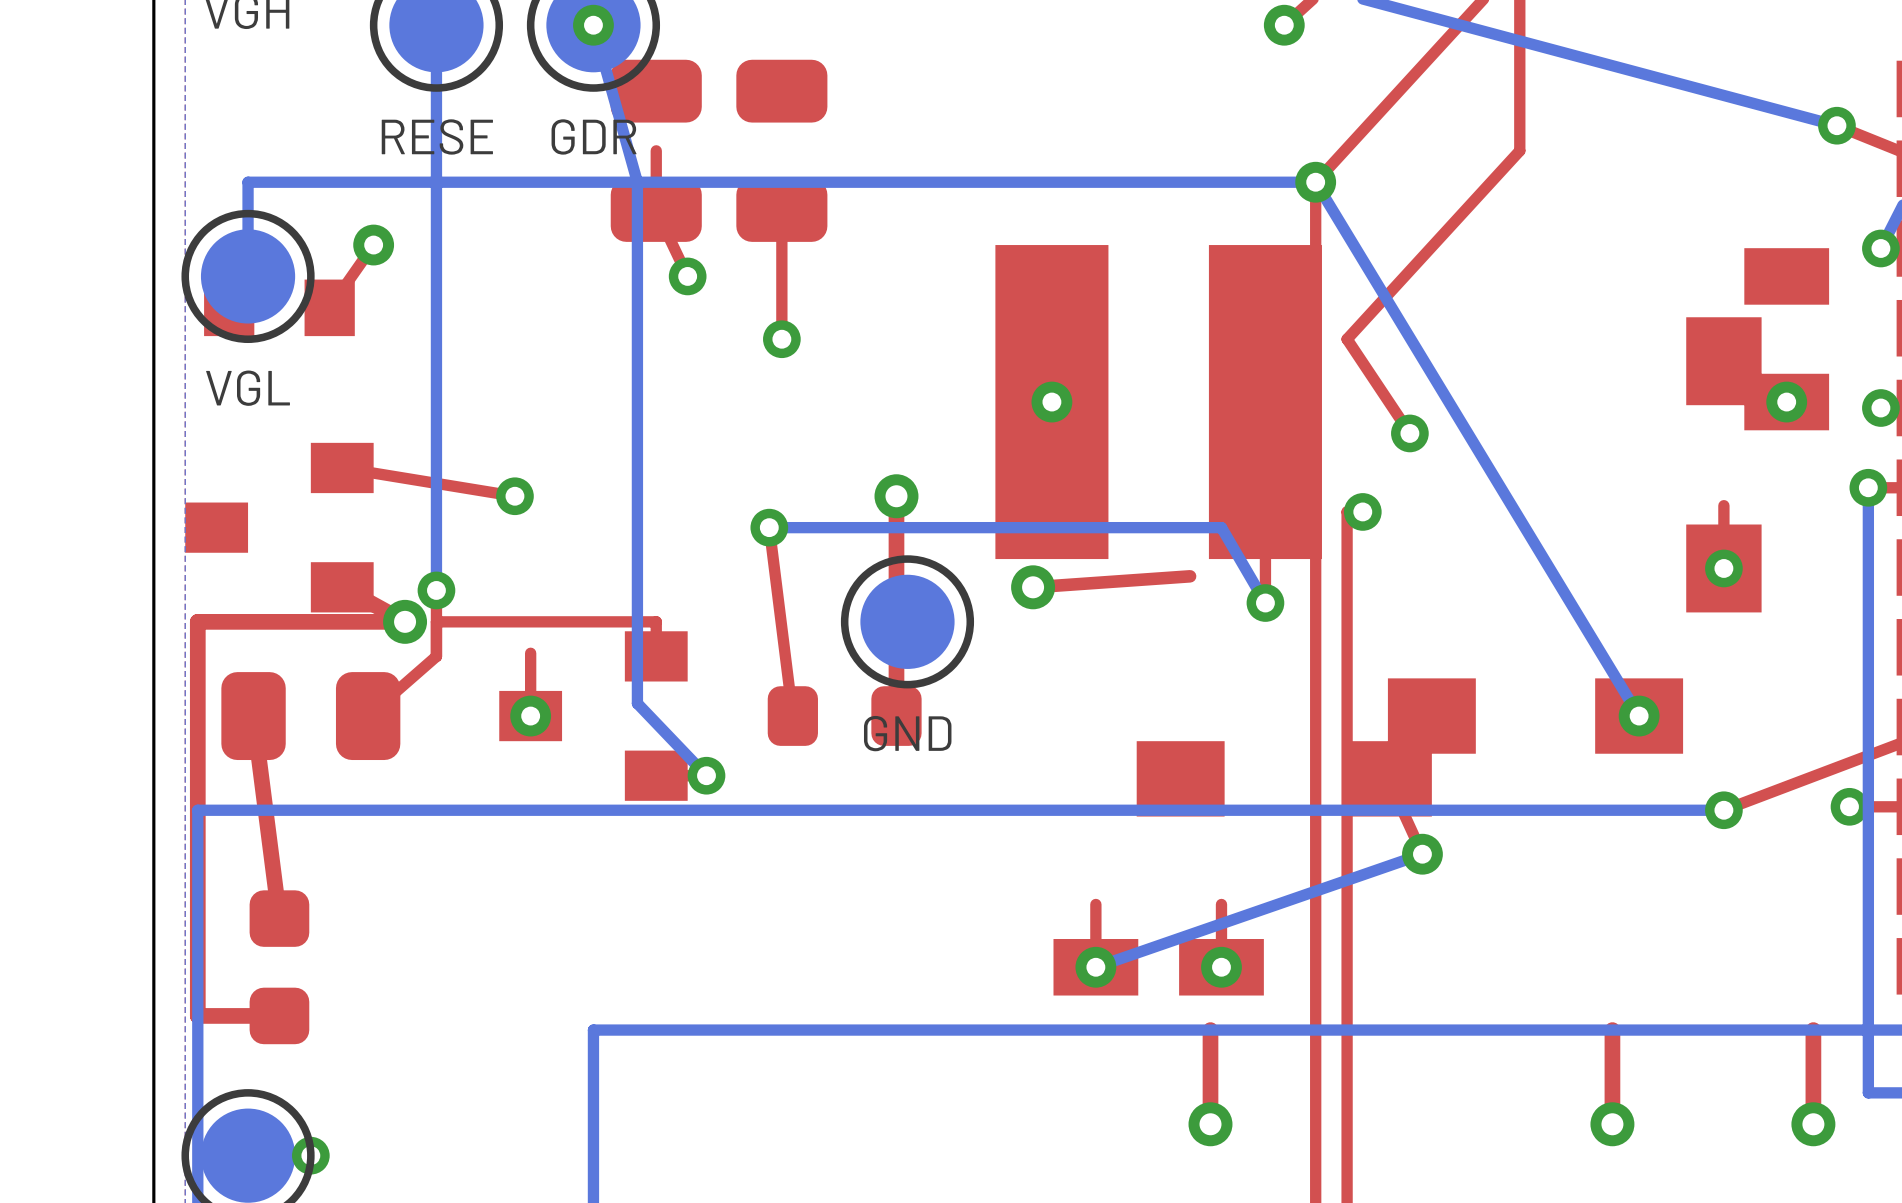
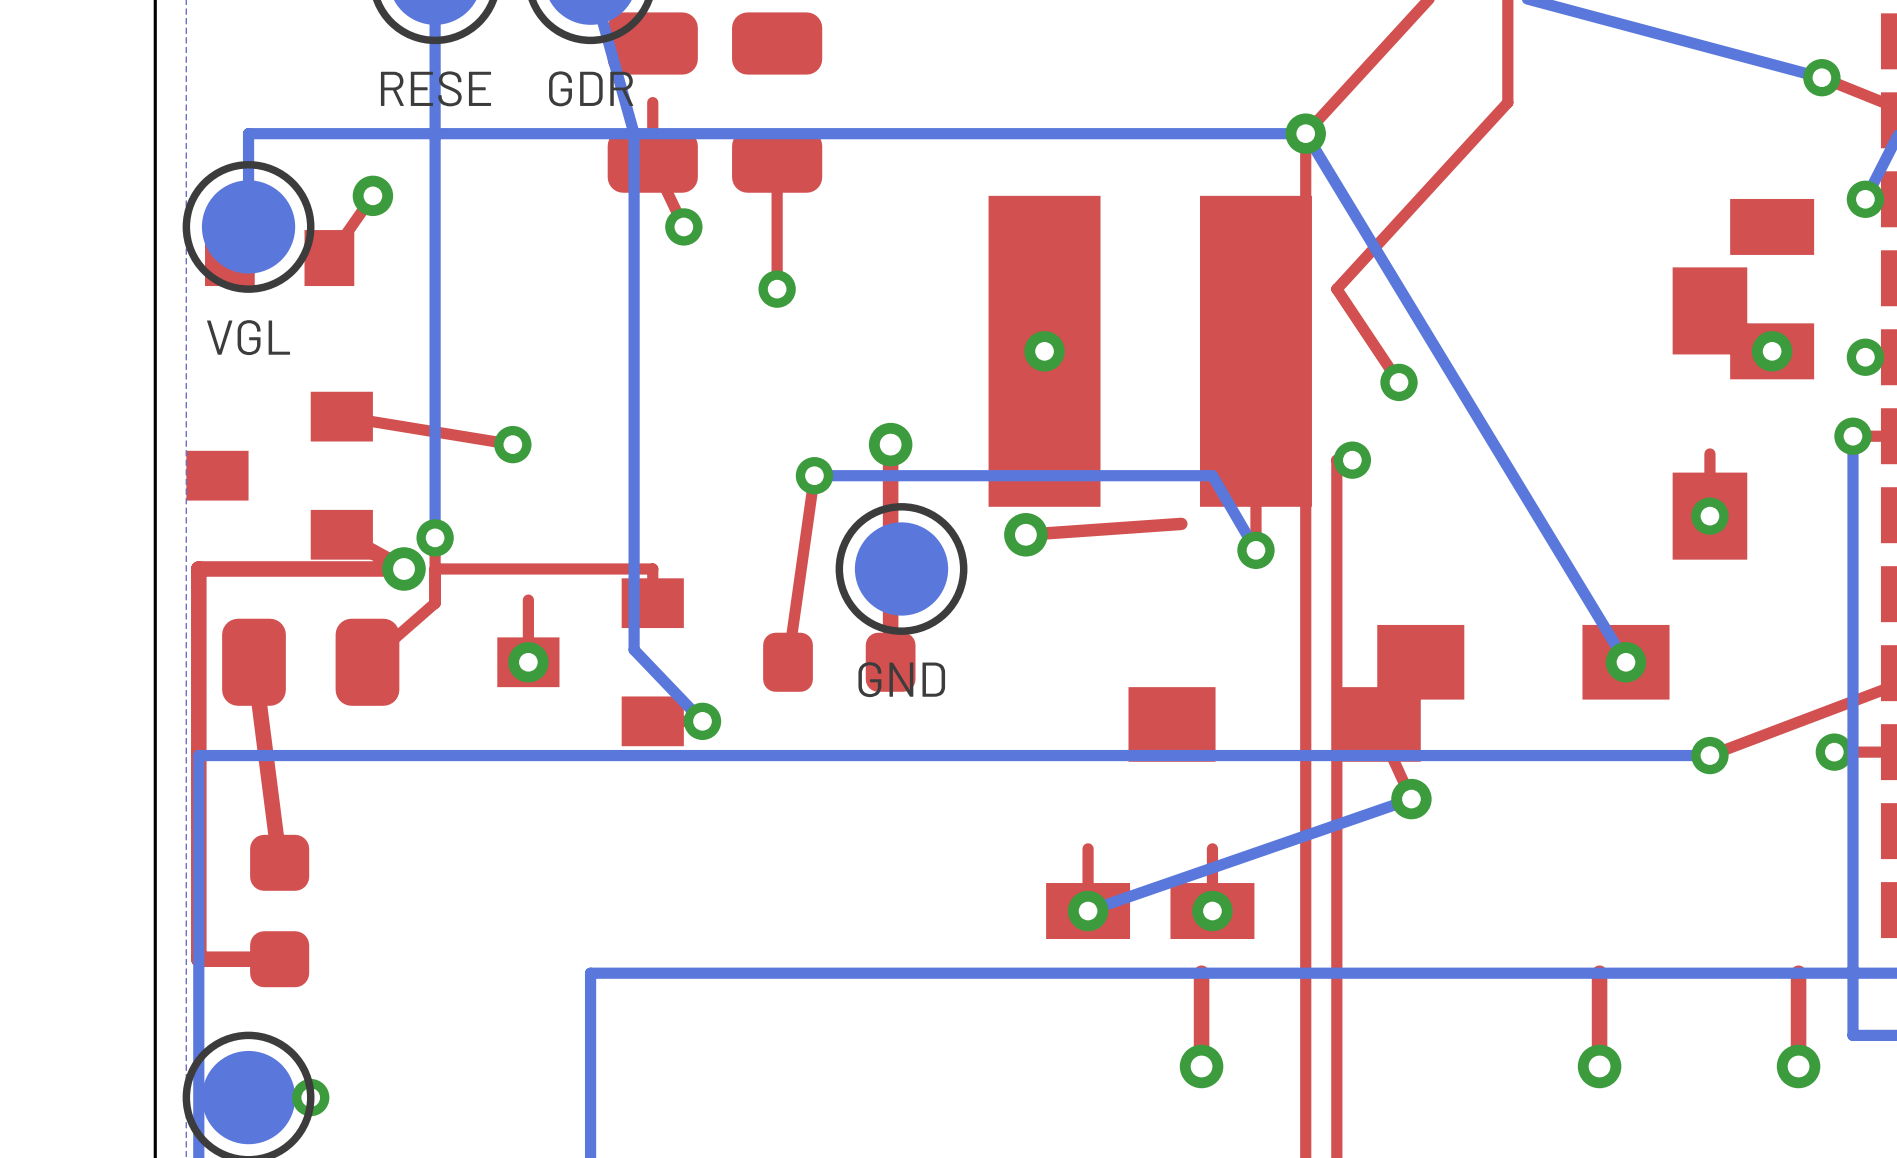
top track: (769, 527) (792, 716) -> (814, 475) (788, 662)
via position: (769, 527) -> (814, 475)
bottom track: (819, 527) (769, 527) -> none

